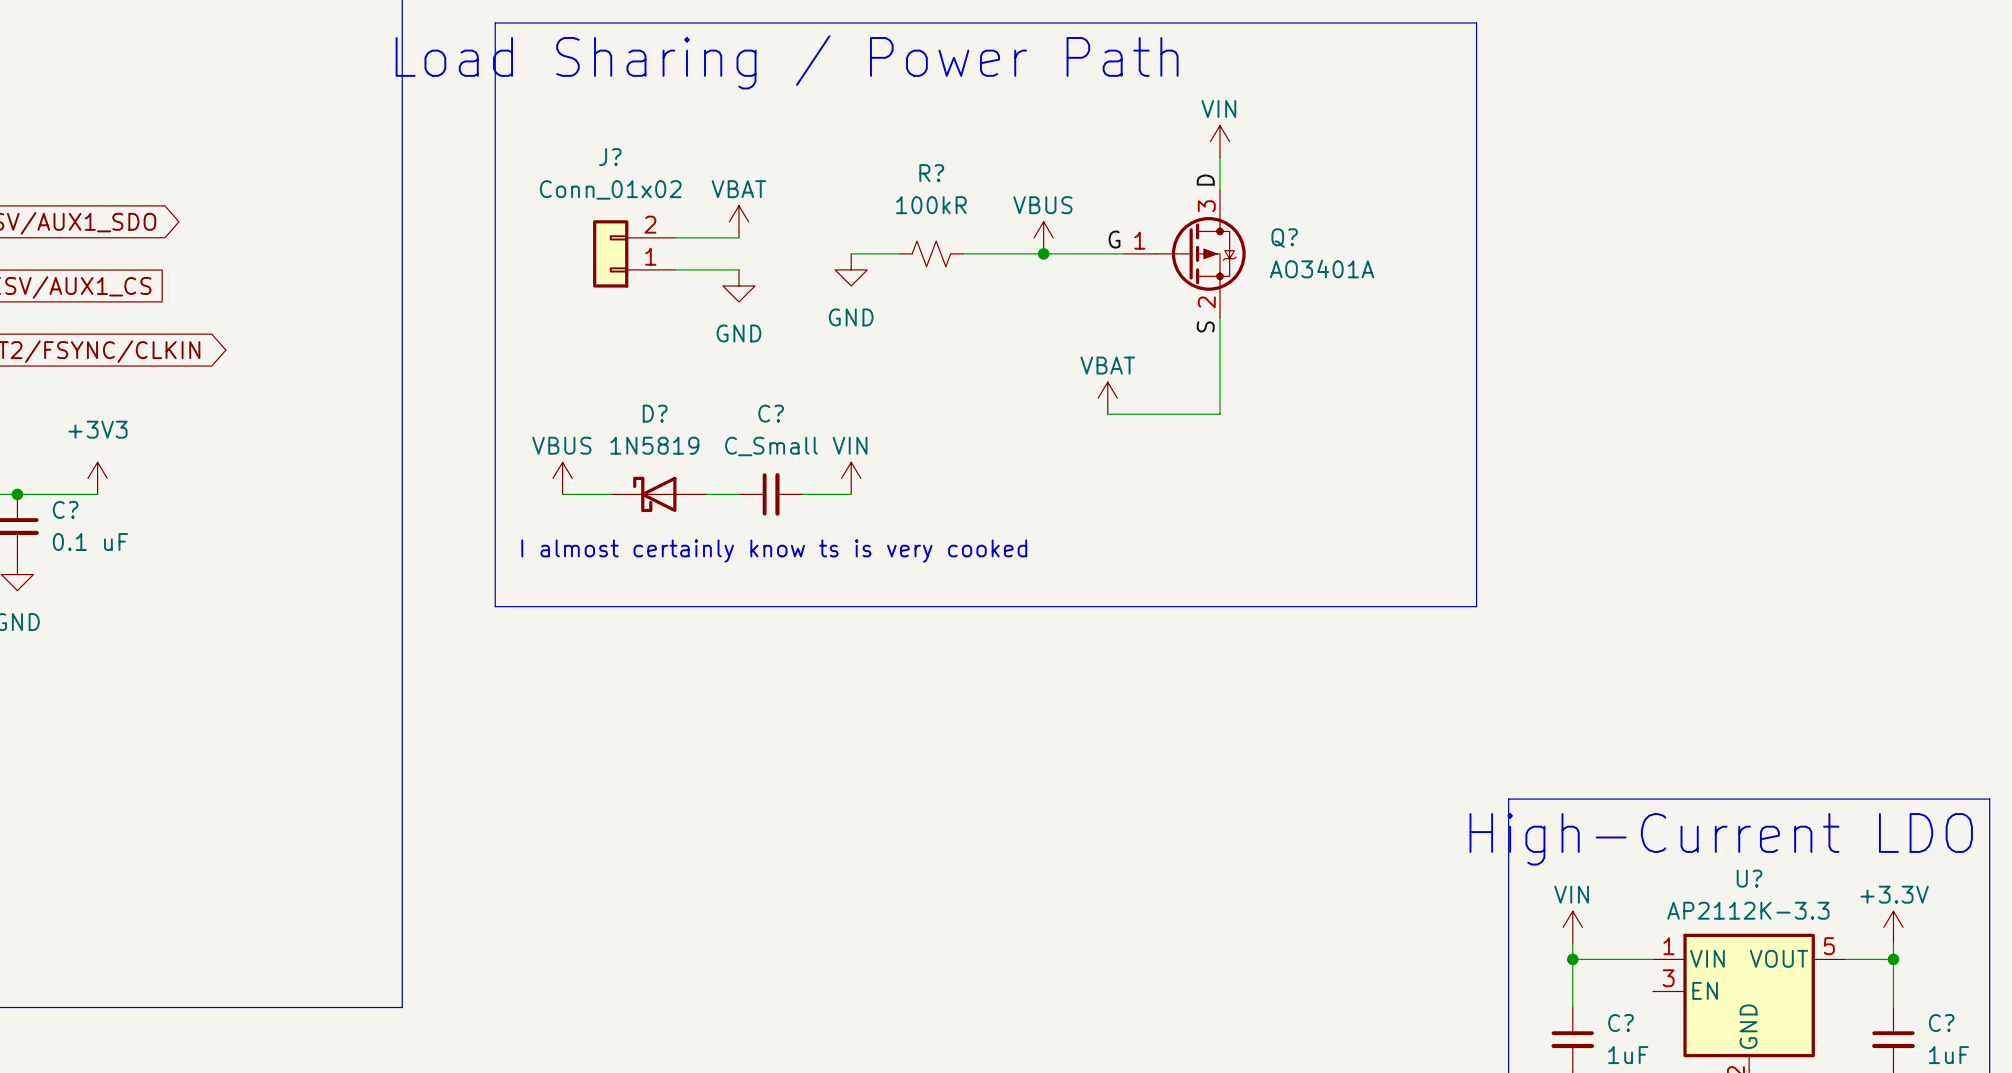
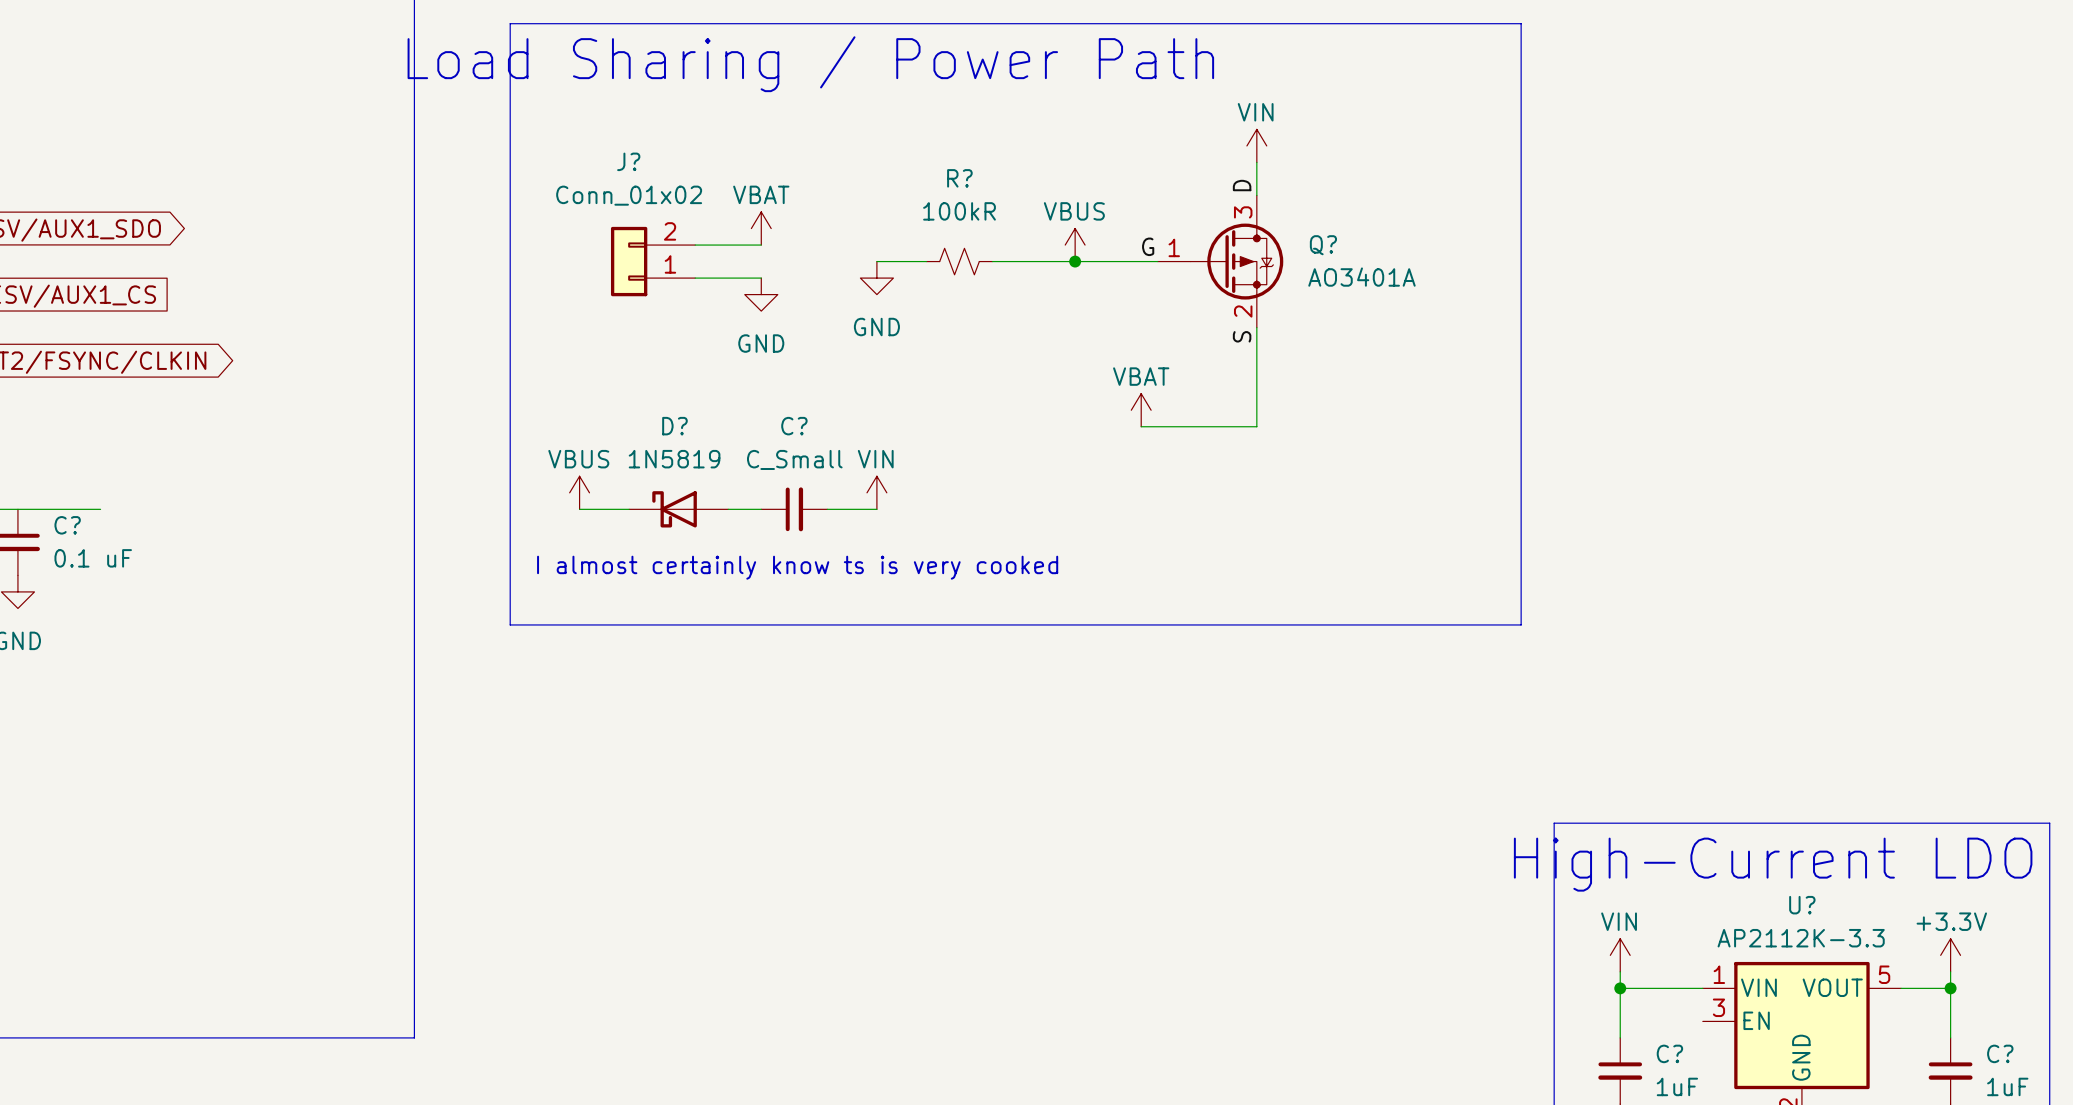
power symbol: +3V3 (97, 478) -> none
junction: (17, 494) -> none

